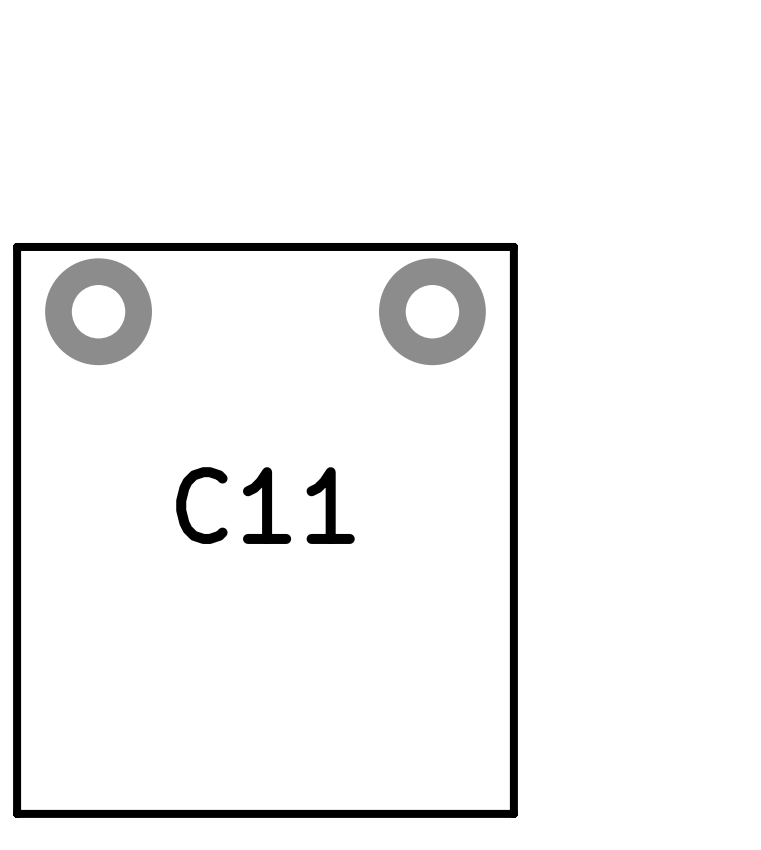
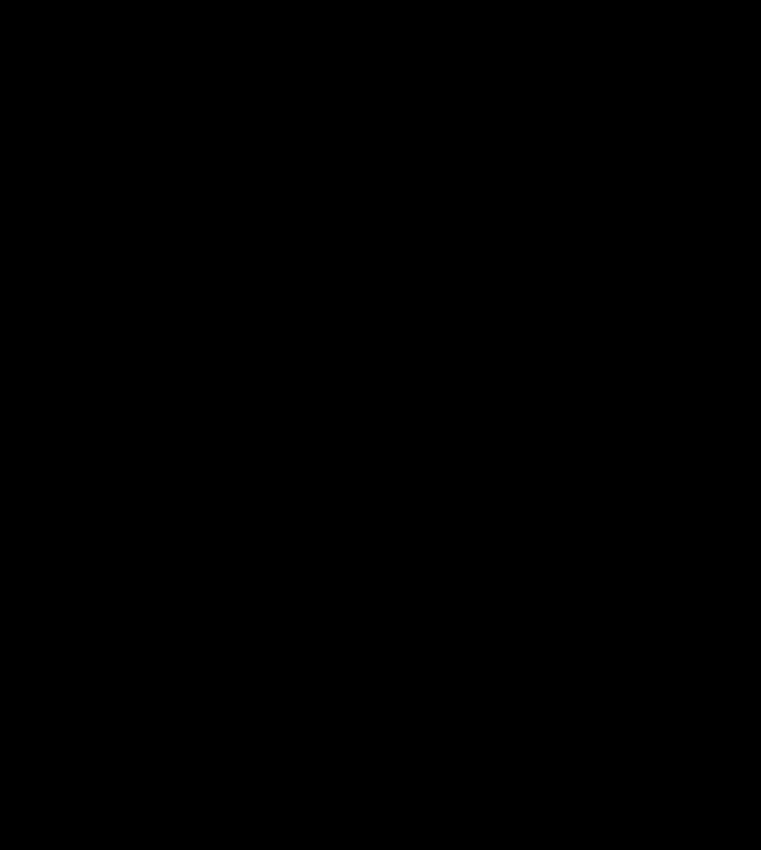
C11: (265, 530) -> none

